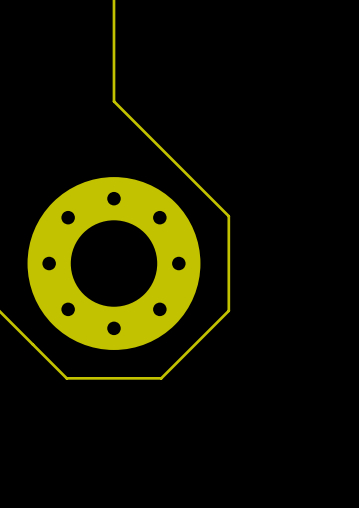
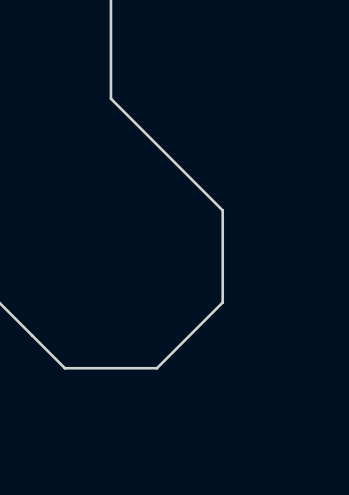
part: (113, 263) -> none

